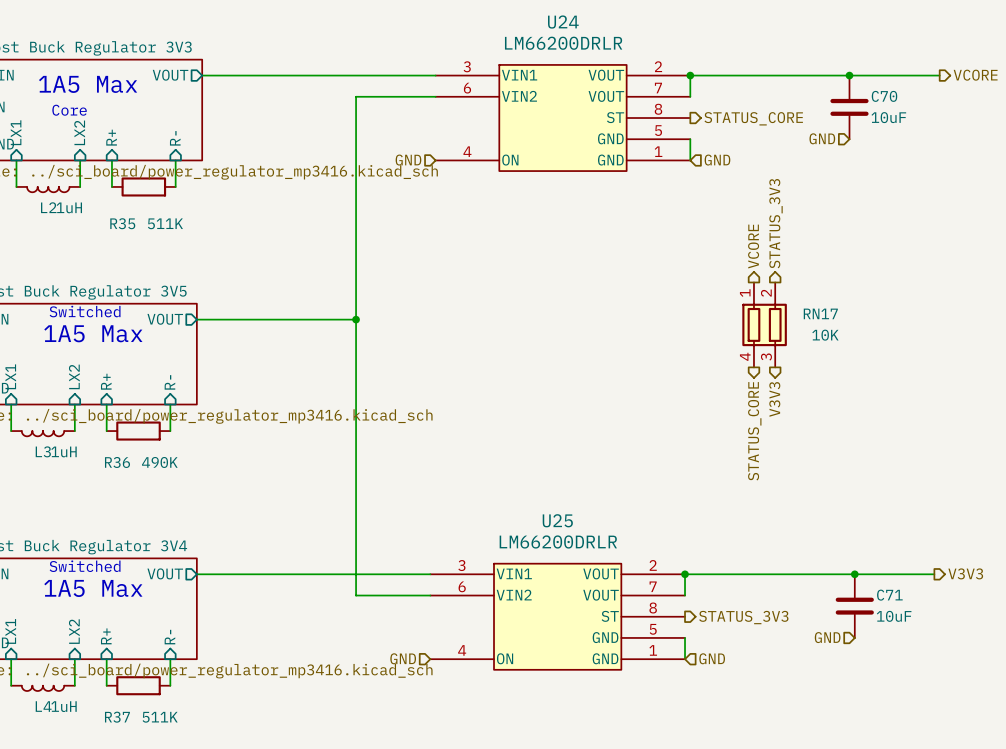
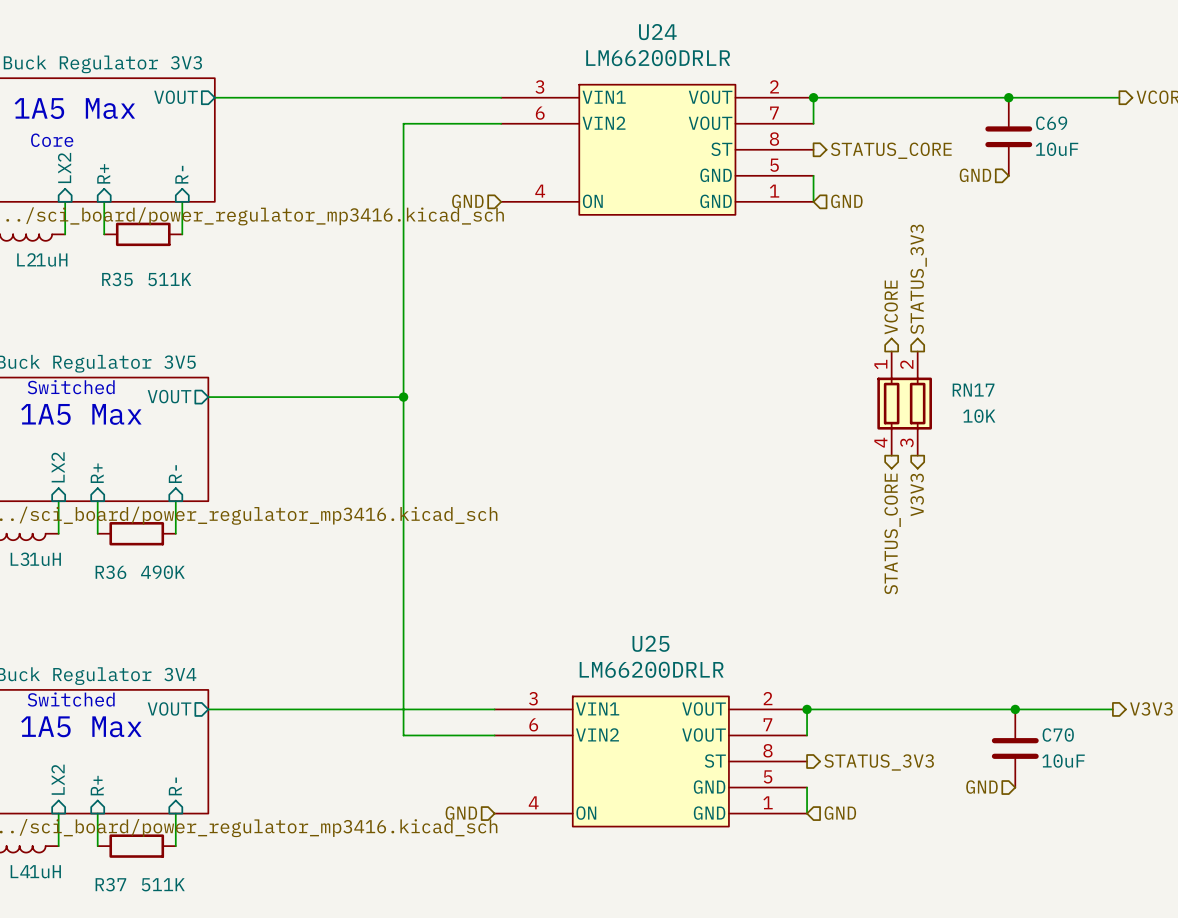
C70 name: C70 (884, 96) -> C69 (1051, 123)
C71 name: C71 (889, 595) -> C70 (1058, 734)

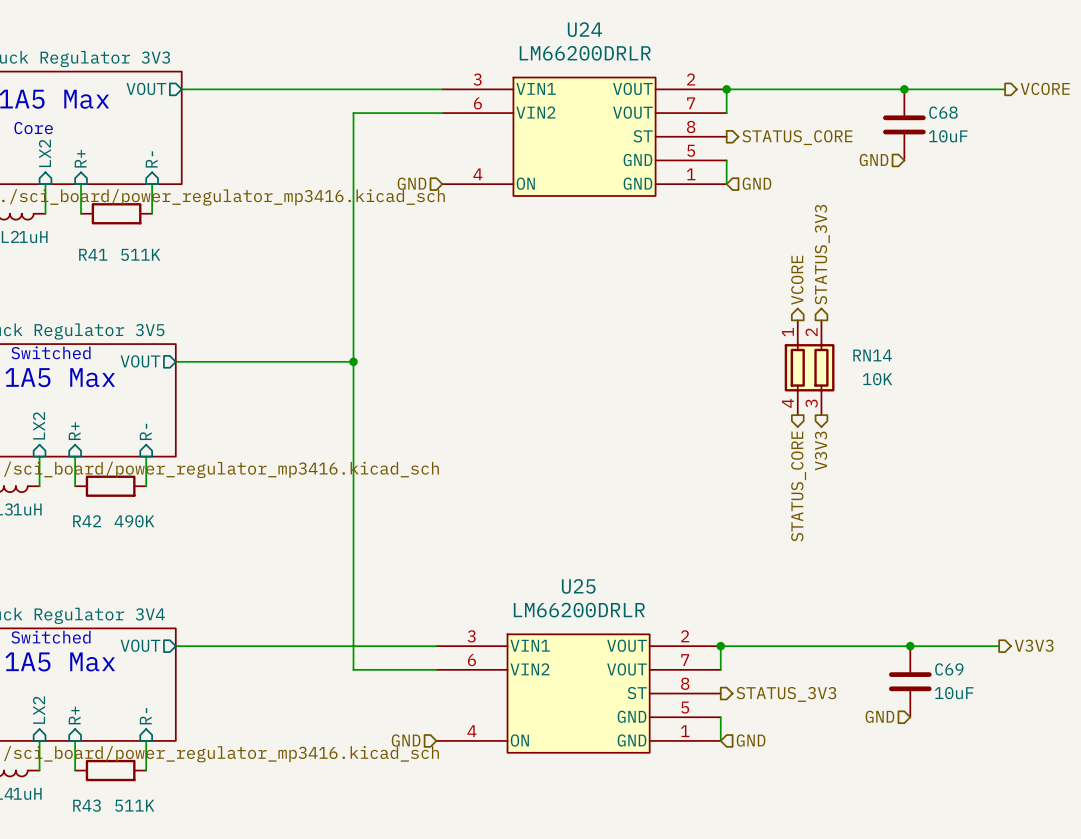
C69 name: C69 (1051, 123) -> C68 (943, 112)
R35 name: R35 (117, 279) -> R41 (93, 254)
RN17 name: RN17 (973, 390) -> RN14 (872, 355)
R36 name: R36 (110, 572) -> R42 (87, 521)
C70 name: C70 (1058, 734) -> C69 (949, 669)
R37 name: R37 (110, 884) -> R43 (87, 805)

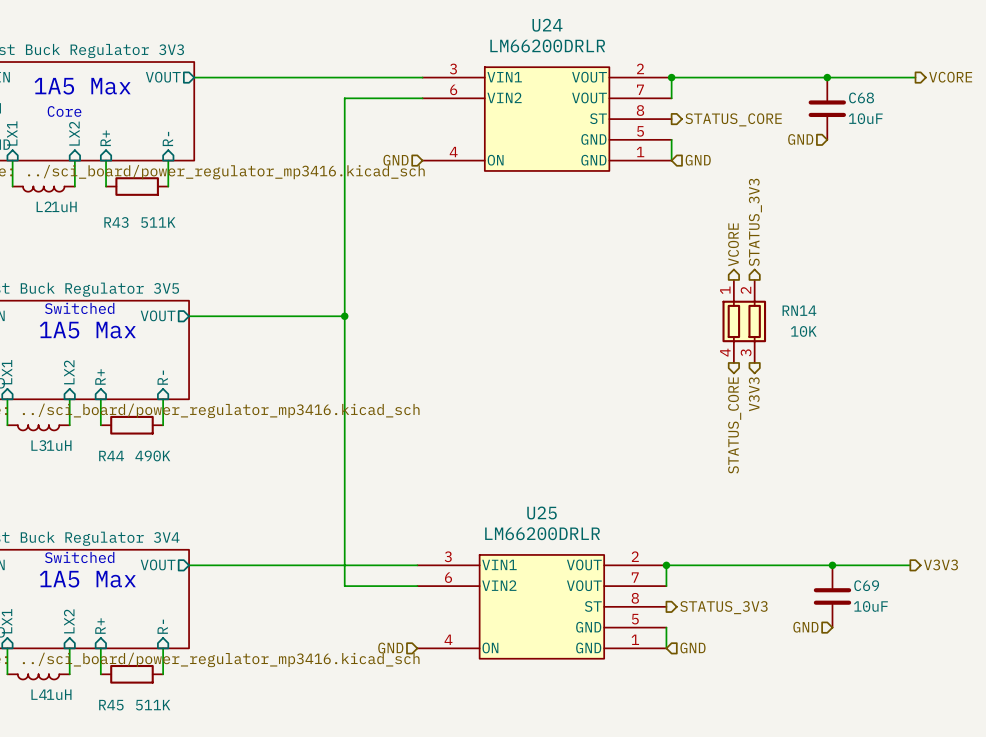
R41 name: R41 (93, 254) -> R43 (116, 222)
R42 name: R42 (87, 521) -> R44 (111, 455)
R43 name: R43 (87, 805) -> R45 (111, 705)

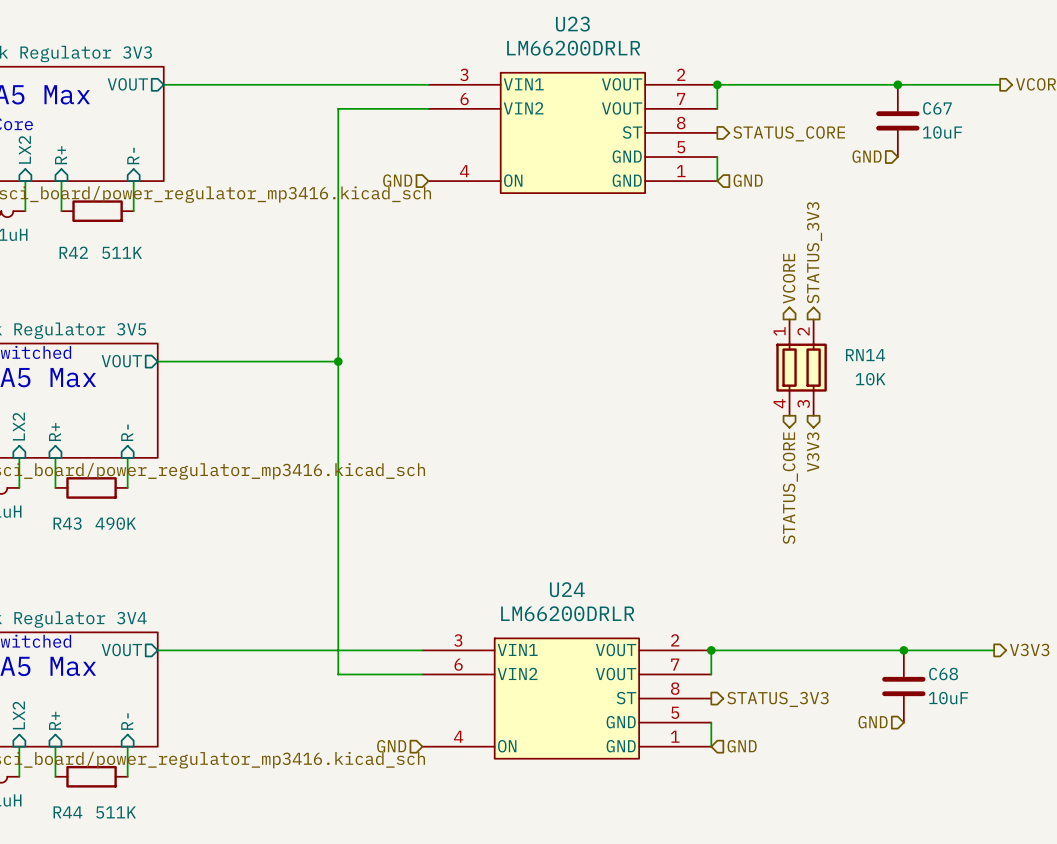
U24 name: U24 (547, 25) -> U23 (572, 24)
C68 name: C68 (861, 97) -> C67 (937, 108)
R43 name: R43 (116, 222) -> R42 (73, 252)
R44 name: R44 (111, 455) -> R43 (67, 523)
U25 name: U25 (542, 512) -> U24 (567, 589)
C69 name: C69 (866, 585) -> C68 (943, 674)
R45 name: R45 (111, 705) -> R44 (67, 812)

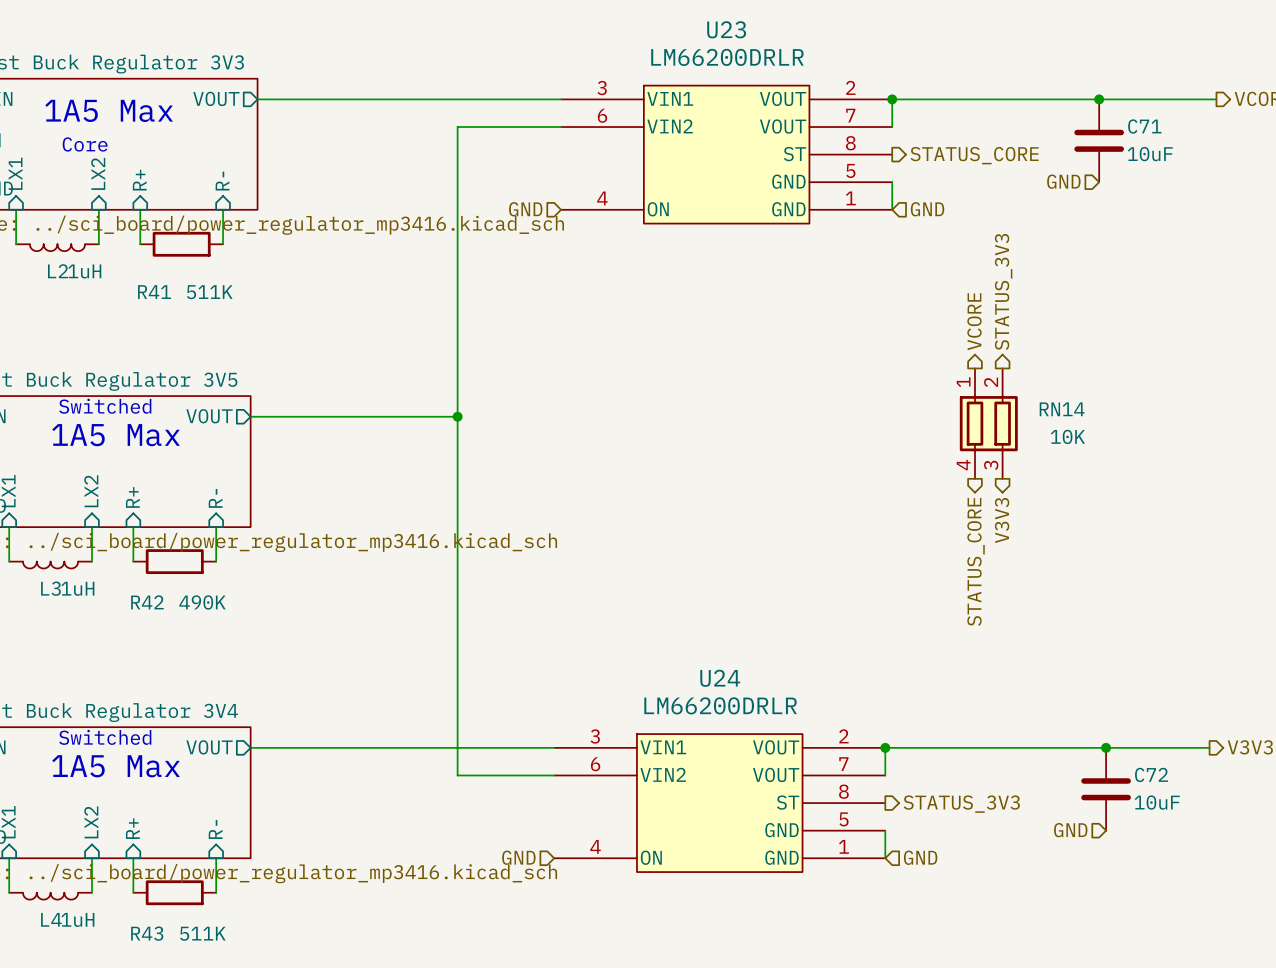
C67 name: C67 (937, 108) -> C71 (1144, 126)
R42 name: R42 (73, 252) -> R41 (154, 292)
R43 name: R43 (67, 523) -> R42 (147, 602)
C68 name: C68 (943, 674) -> C72 (1151, 774)
R44 name: R44 (67, 812) -> R43 (147, 933)

